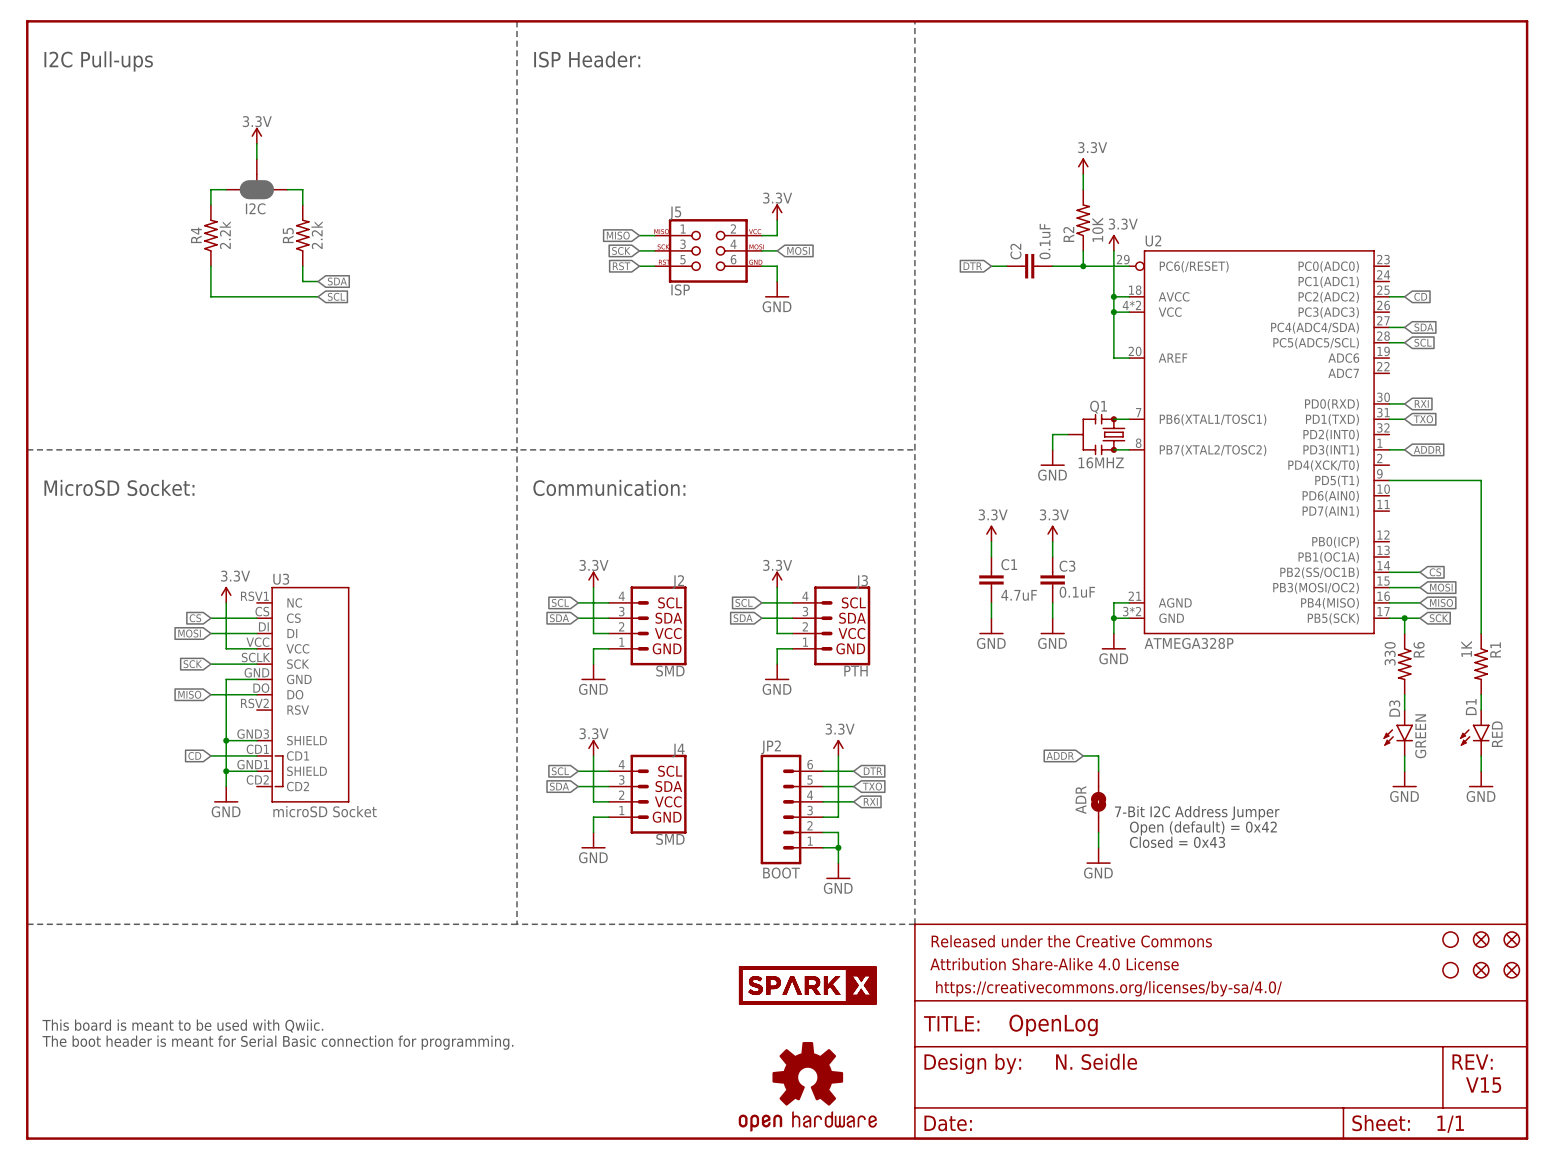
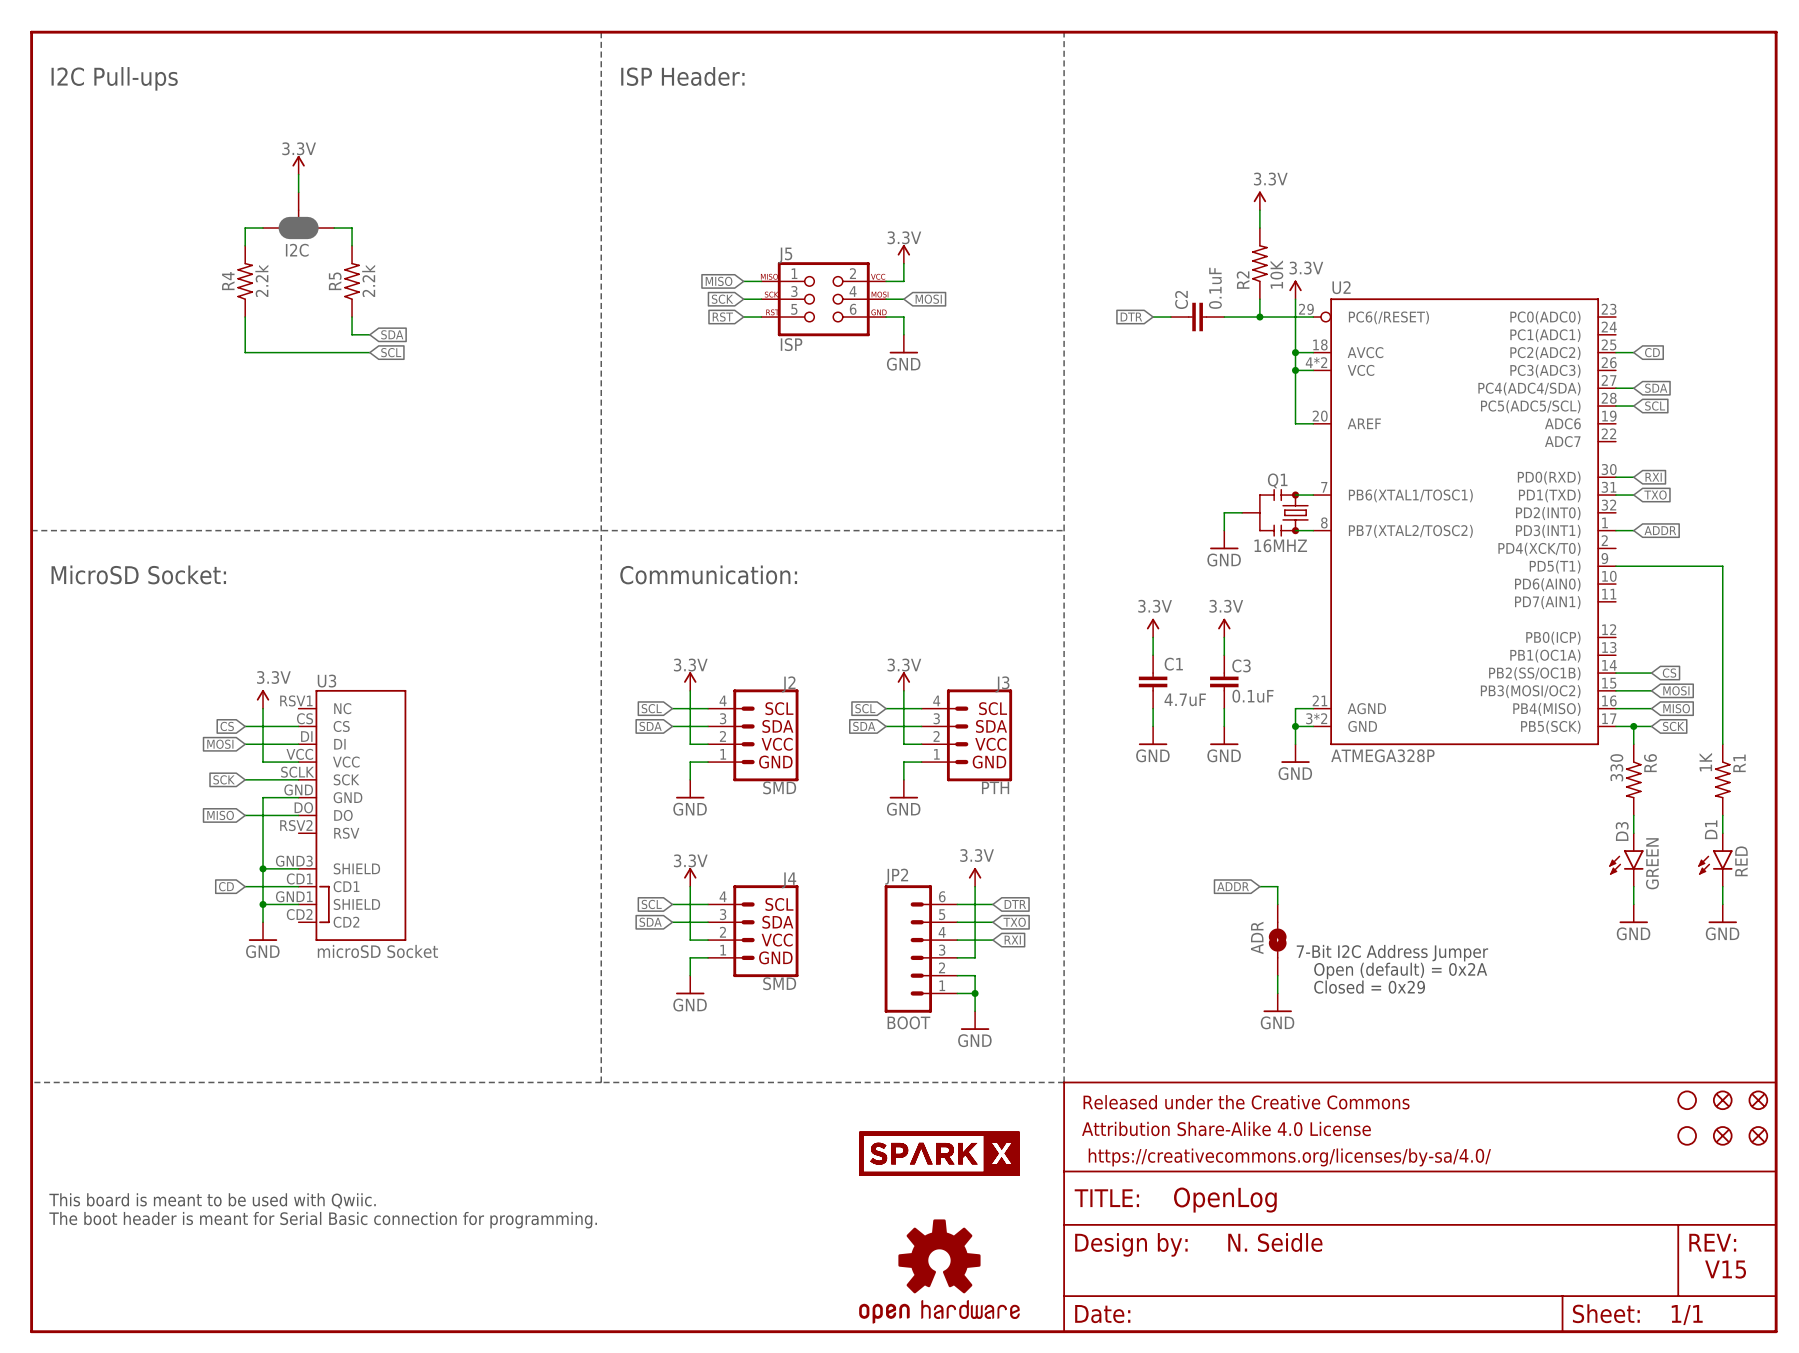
text: Open (default) = 0x42 (1203, 828) -> Open (default) = 0x2A (1400, 970)
text: Closed = 0x43 (1177, 842) -> Closed = 0x29 (1369, 987)

